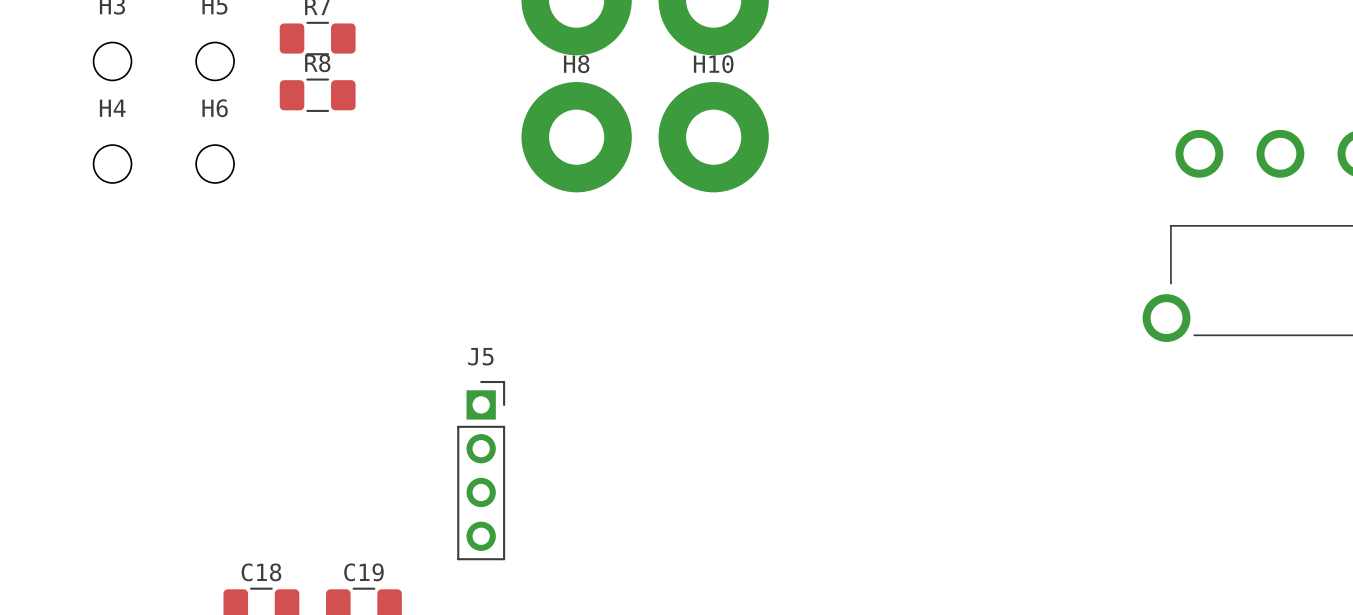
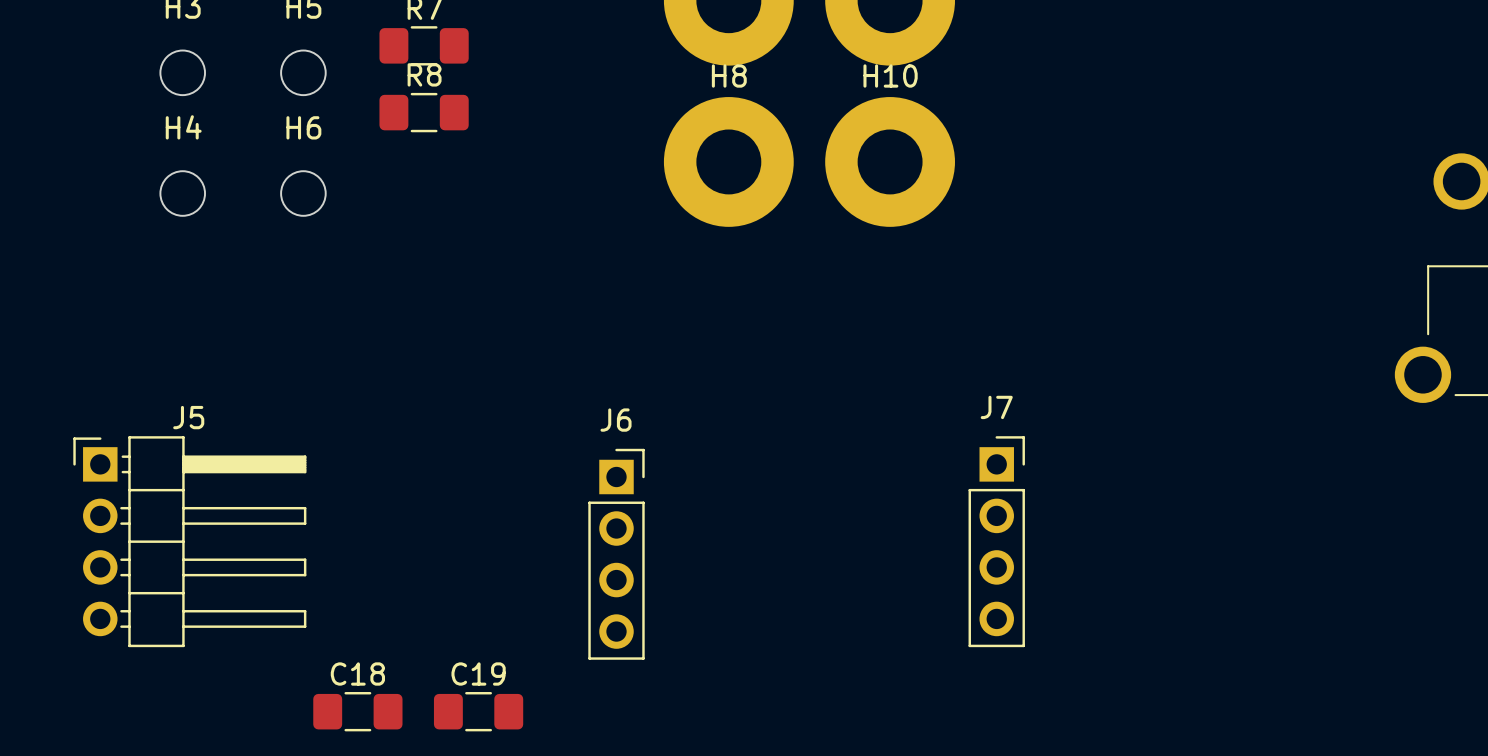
J5 name: J5 (480, 356) -> J6 (616, 420)
J5: none -> (189, 541)
J7: none -> (996, 541)

